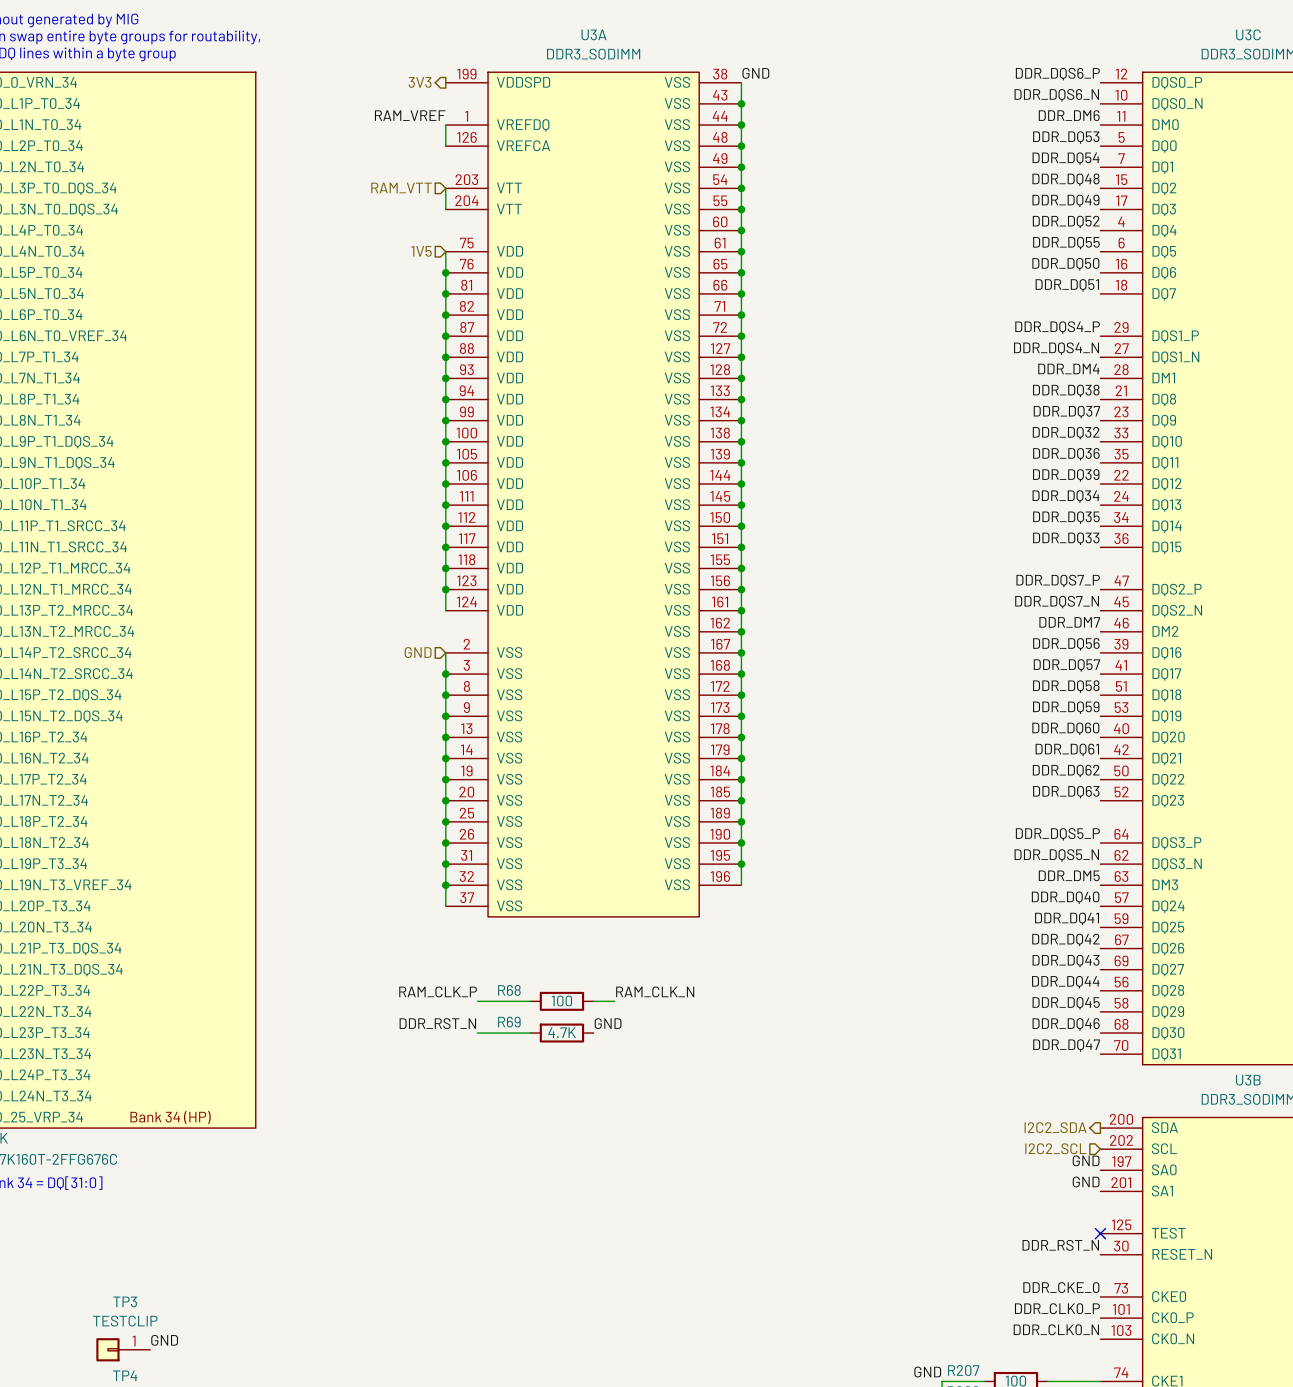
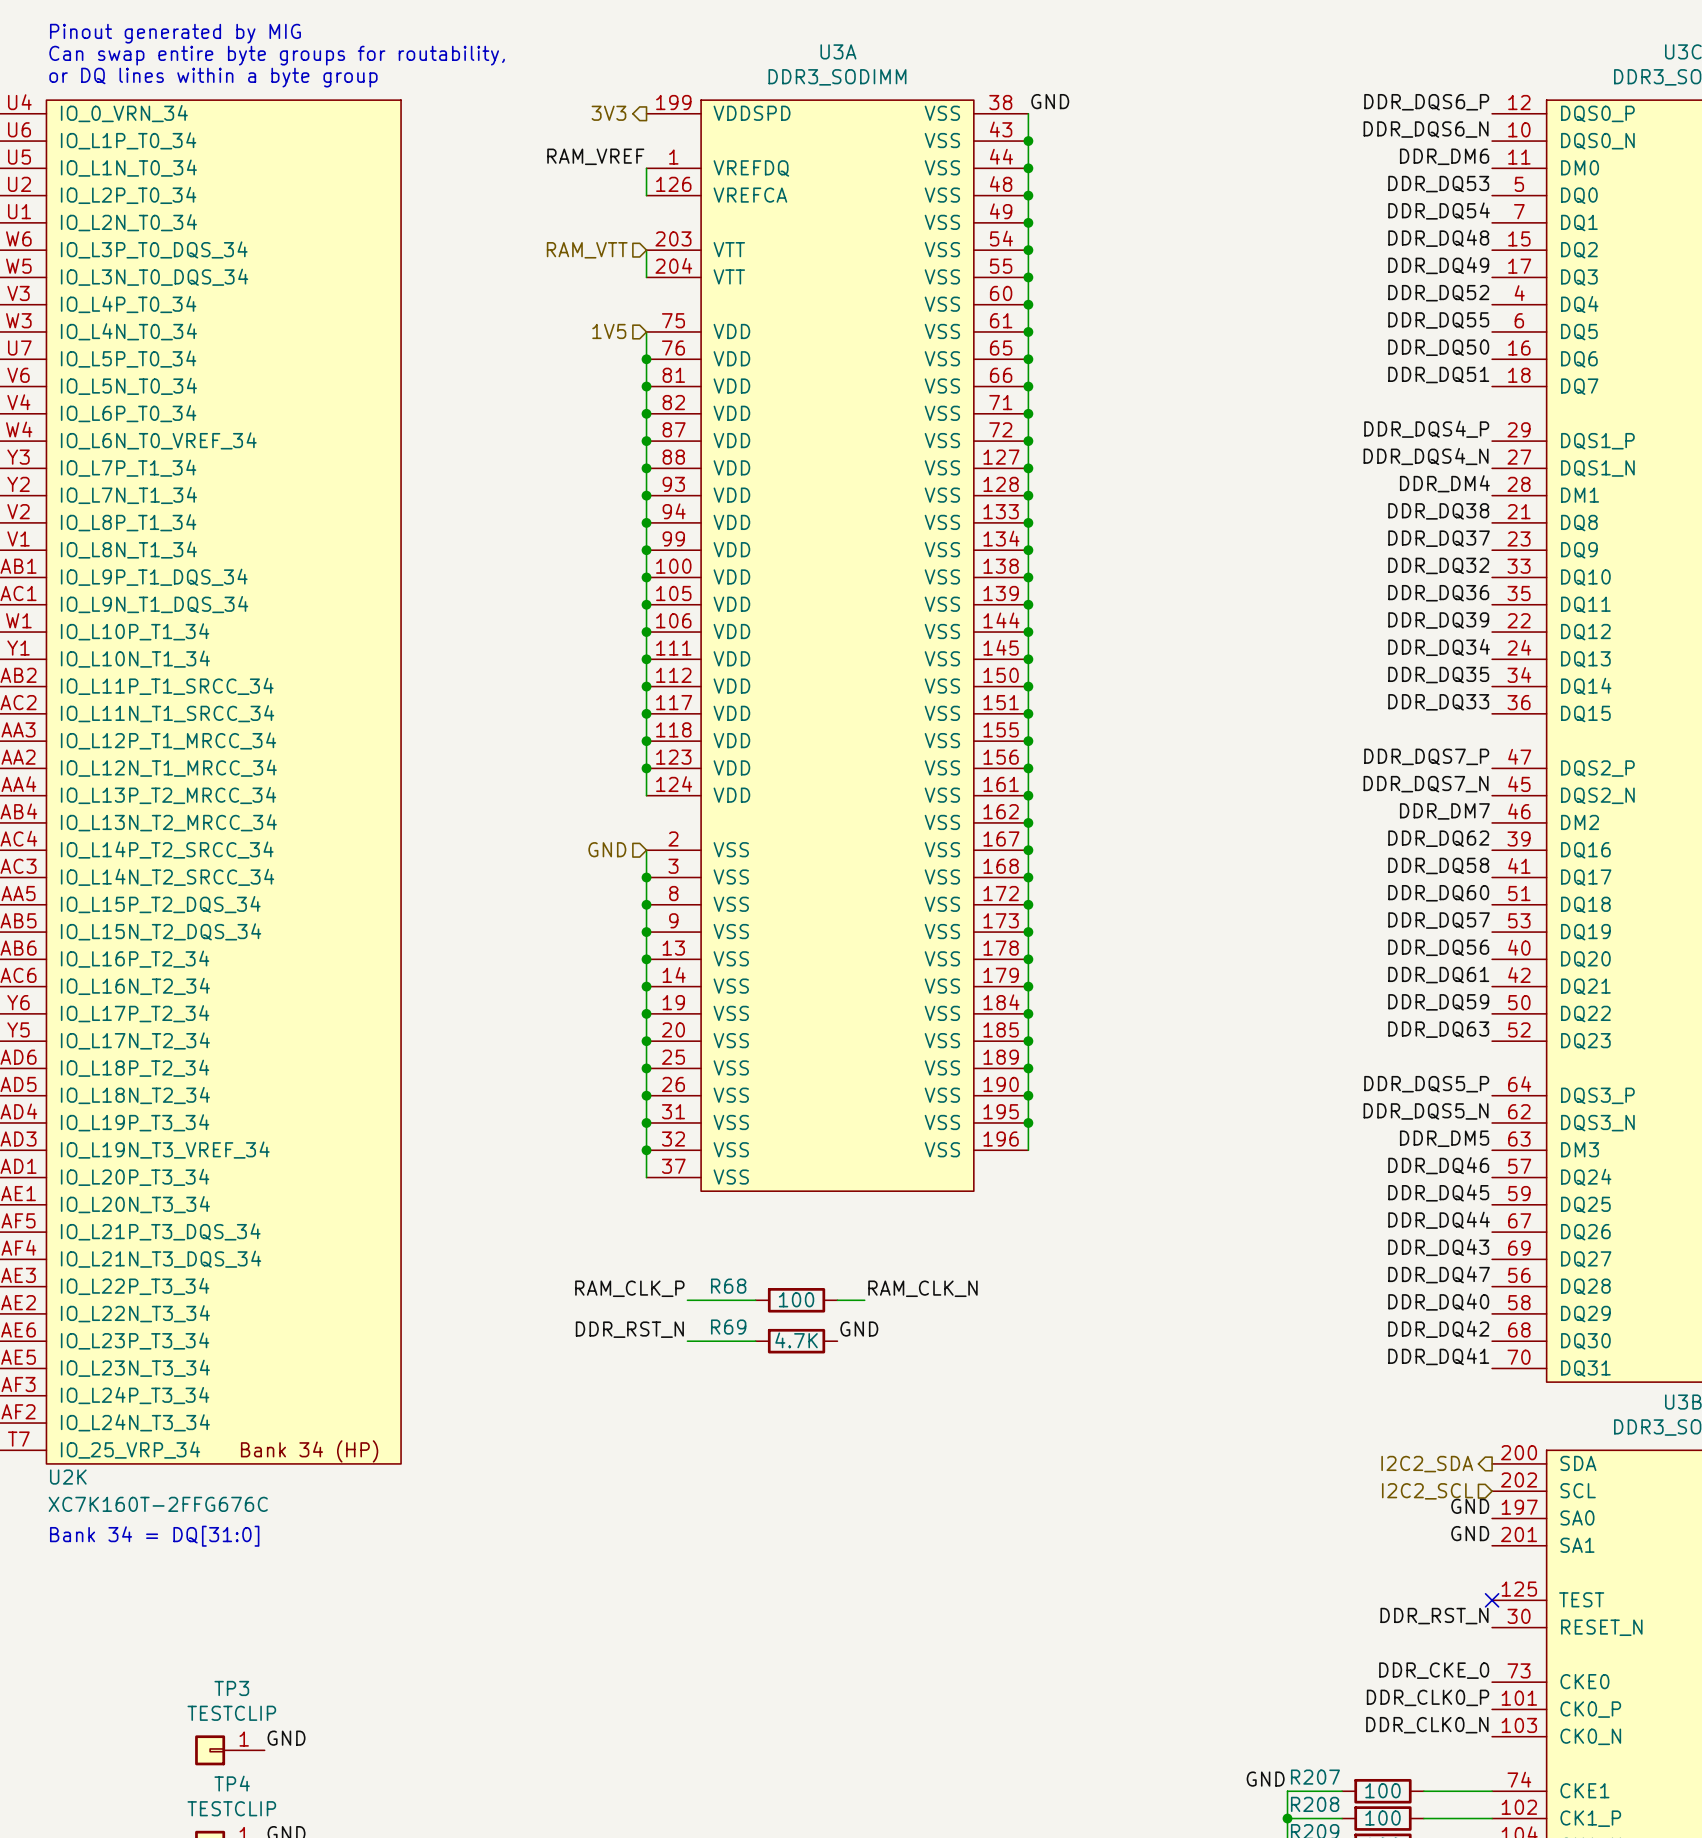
label: DDR_DQ56 (1066, 644) -> DDR_DQ62 (1438, 838)
label: DDR_DQ57 (1066, 665) -> DDR_DQ58 (1438, 865)
label: DDR_DQ58 (1066, 686) -> DDR_DQ60 (1438, 893)
label: DDR_DQ59 (1066, 707) -> DDR_DQ57 (1439, 920)
label: DDR_DQ60 (1065, 728) -> DDR_DQ56 (1438, 947)
label: DDR_DQ62 (1066, 771) -> DDR_DQ59 (1438, 1002)
label: DDR_DQ40 (1065, 897) -> DDR_DQ46 (1438, 1165)
label: DDR_DQ41 (1067, 918) -> DDR_DQ45 (1438, 1192)
label: DDR_DQ42 (1065, 939) -> DDR_DQ44 (1439, 1220)
label: DDR_DQ44 (1065, 982) -> DDR_DQ47 (1439, 1274)
label: DDR_DQ45 (1066, 1003) -> DDR_DQ40 (1438, 1302)
label: DDR_DQ46 (1066, 1024) -> DDR_DQ42 (1438, 1329)
label: DDR_DQ47 (1066, 1045) -> DDR_DQ41 (1438, 1356)

